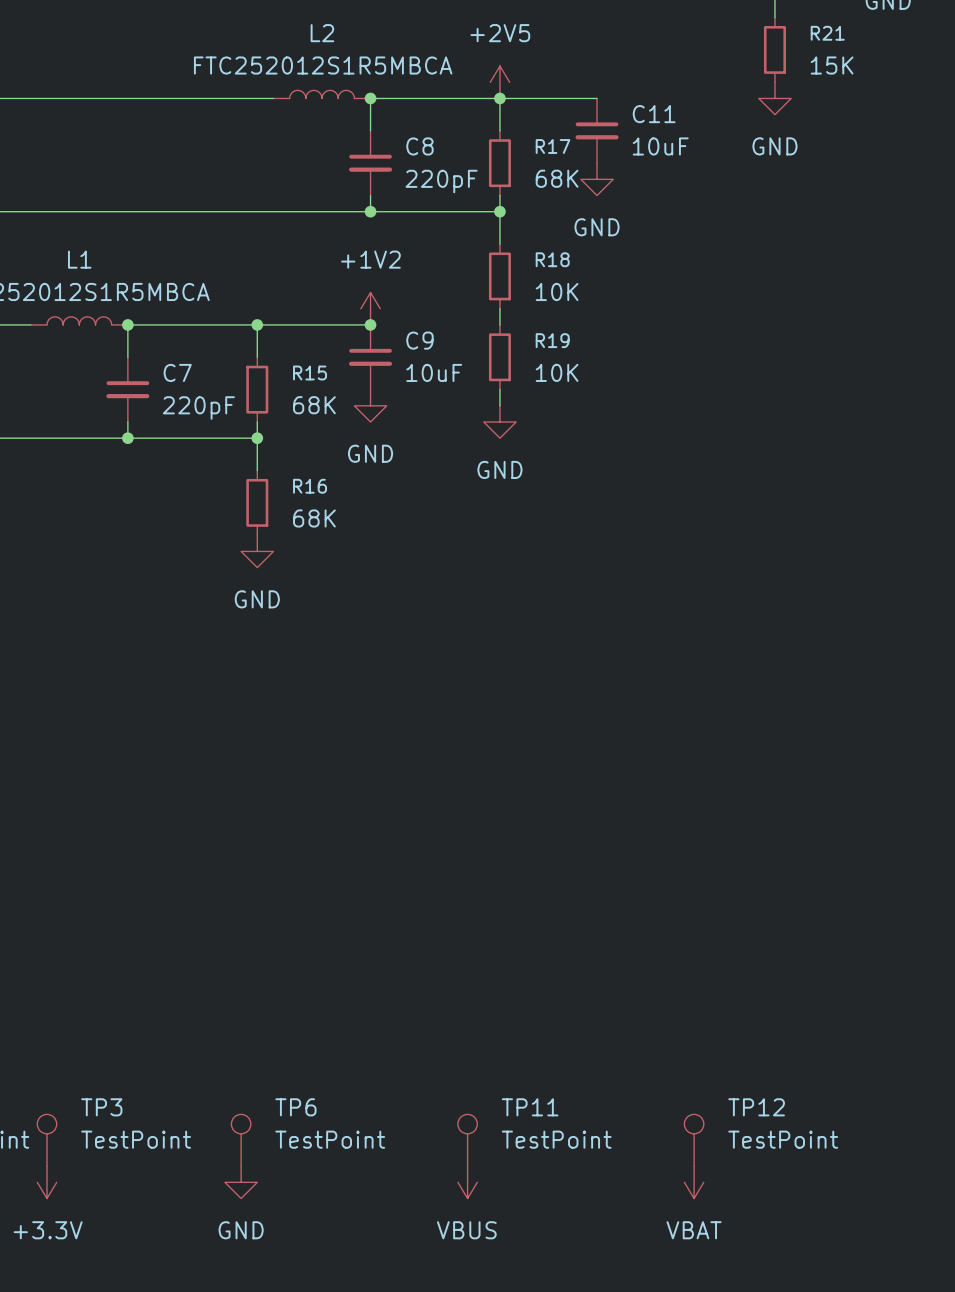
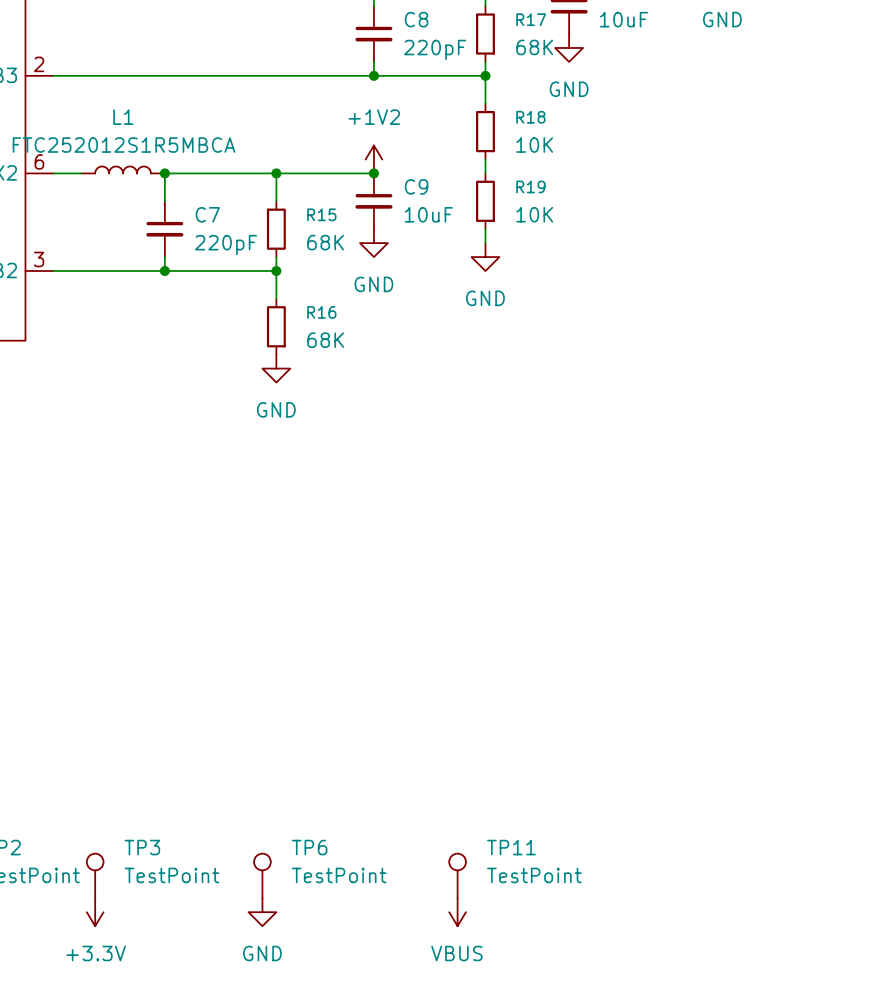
TP12: TestPoint (694, 1140) -> none
power symbol: VBAT (694, 1182) -> none

